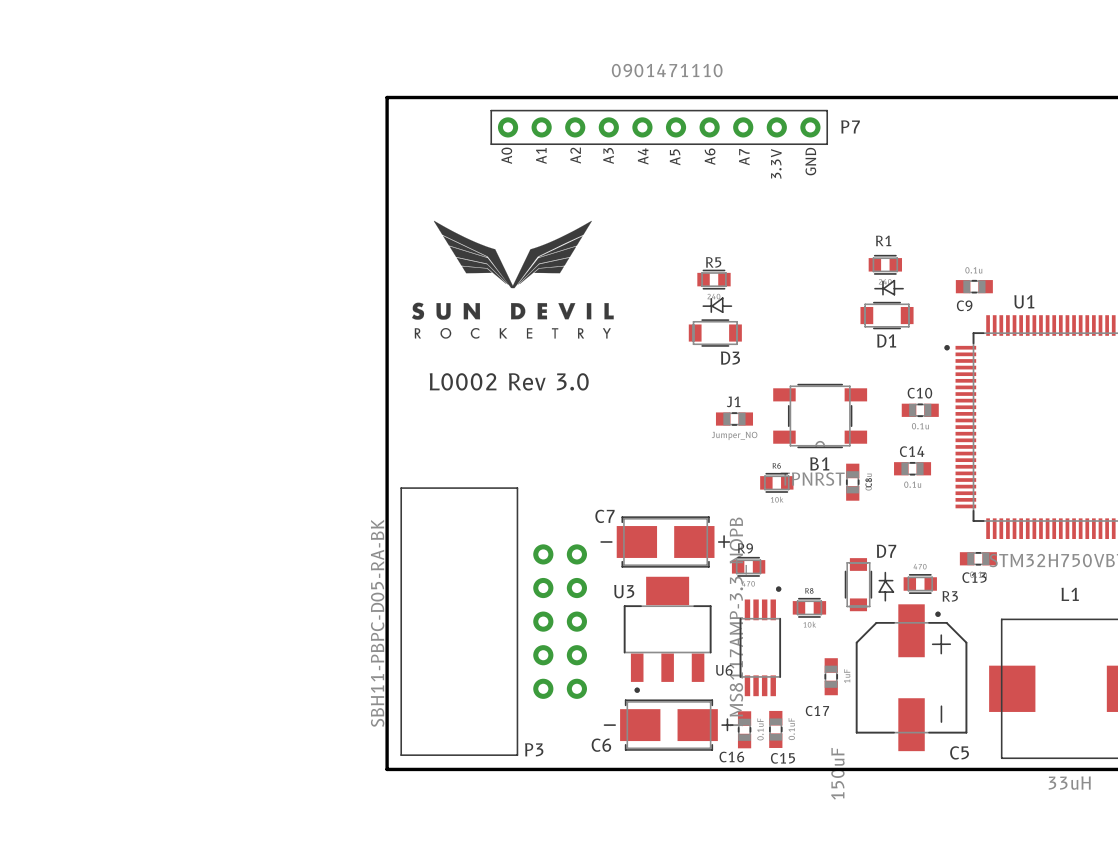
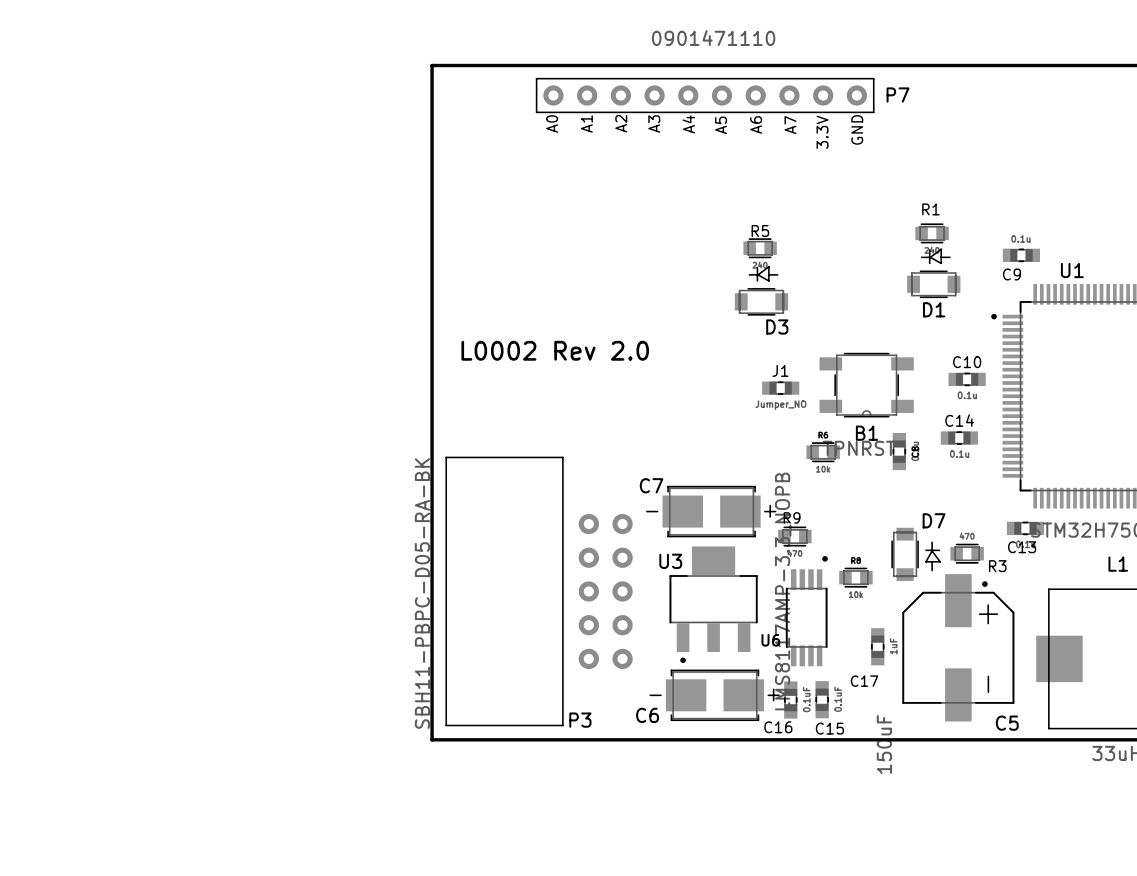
drawing: [412, 220, 614, 339] -> none
text: L0002 Rev 3.0 (509, 381) -> L0002 Rev 2.0 (555, 350)

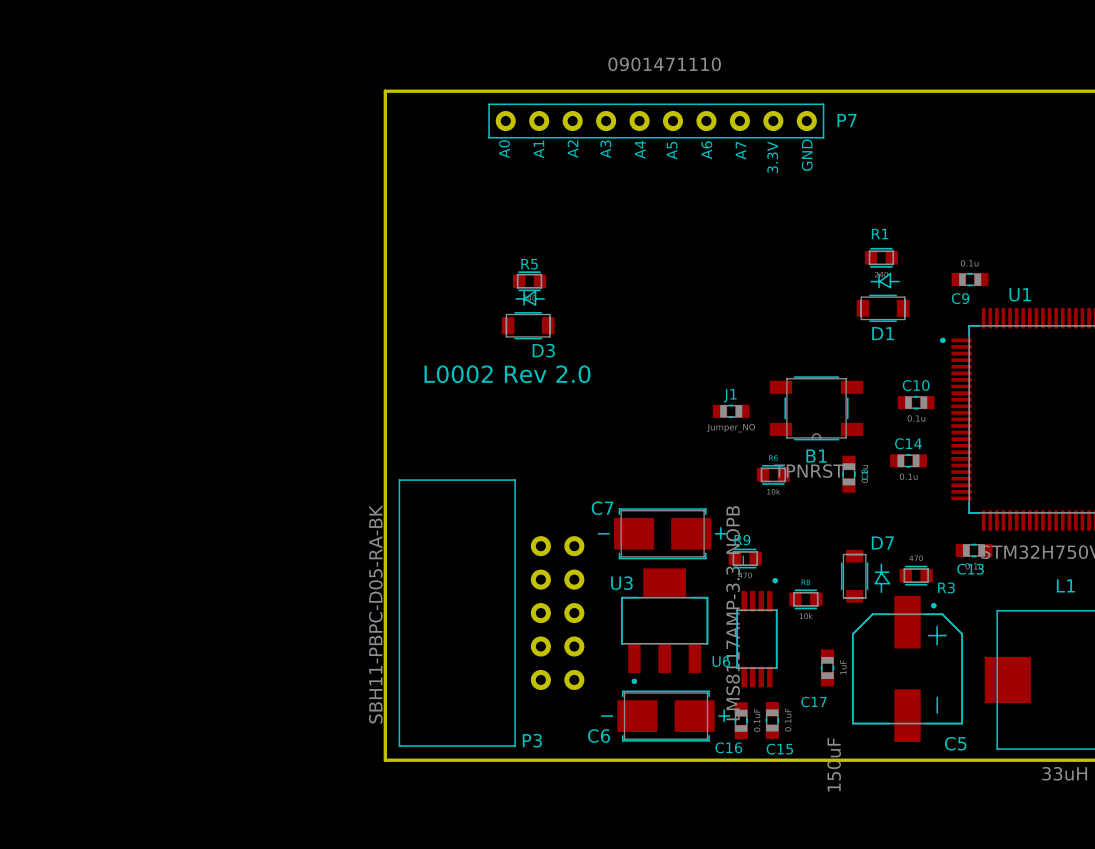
R5 position: (760, 248) -> (529, 281)
D3 position: (761, 290) -> (528, 314)

